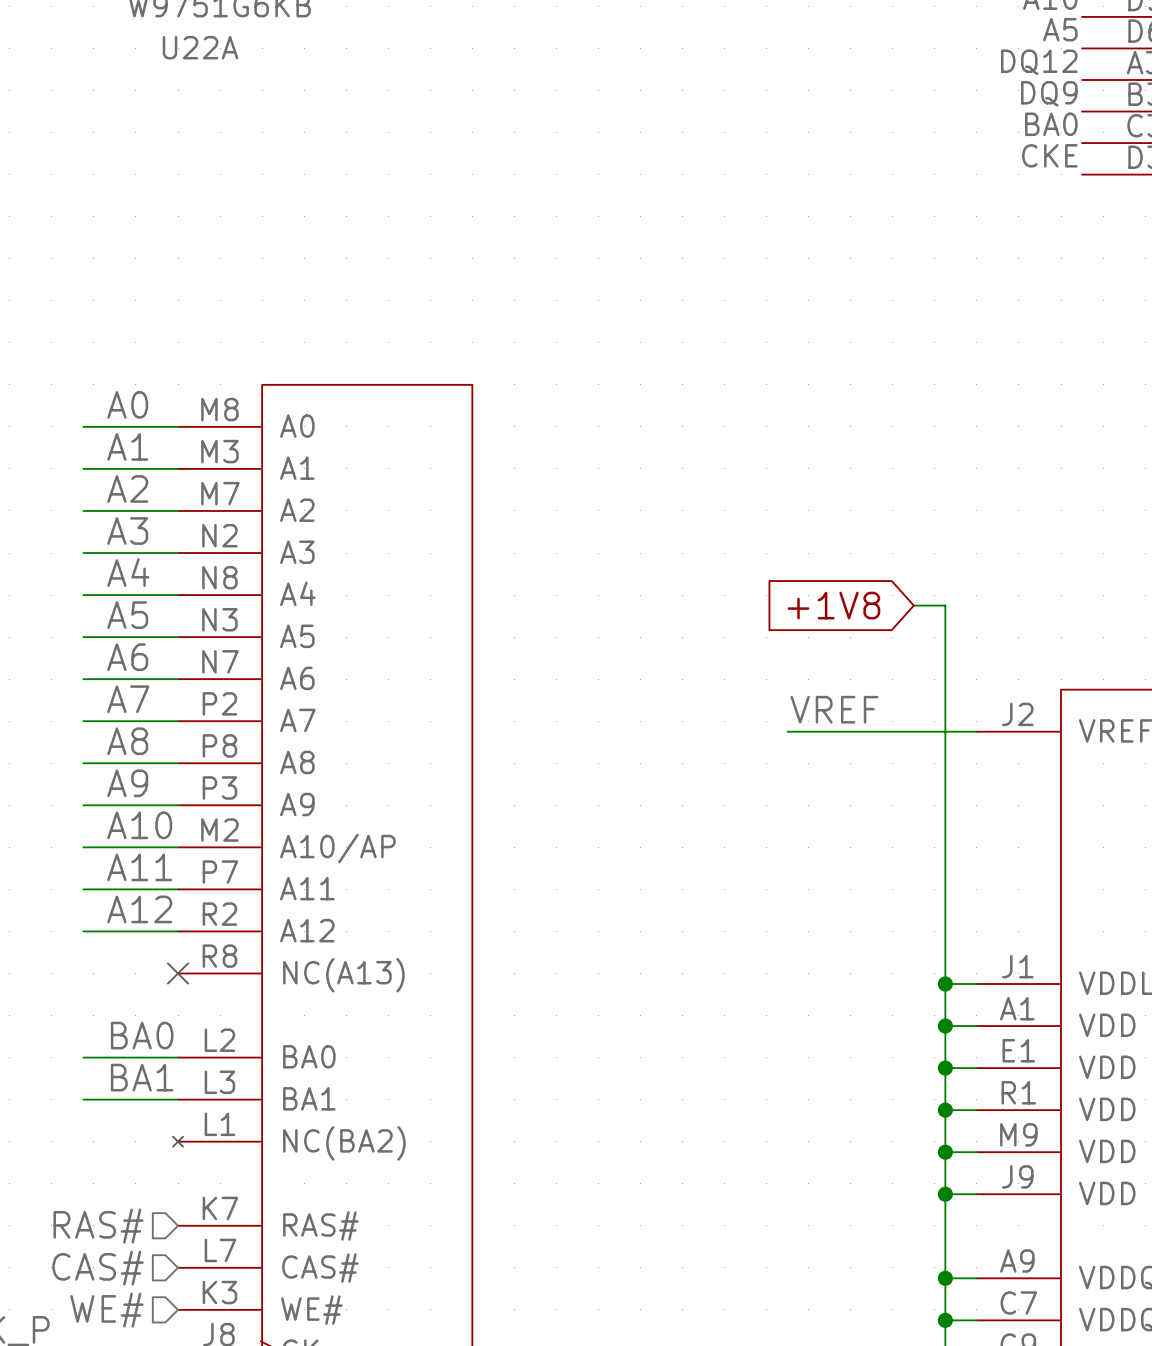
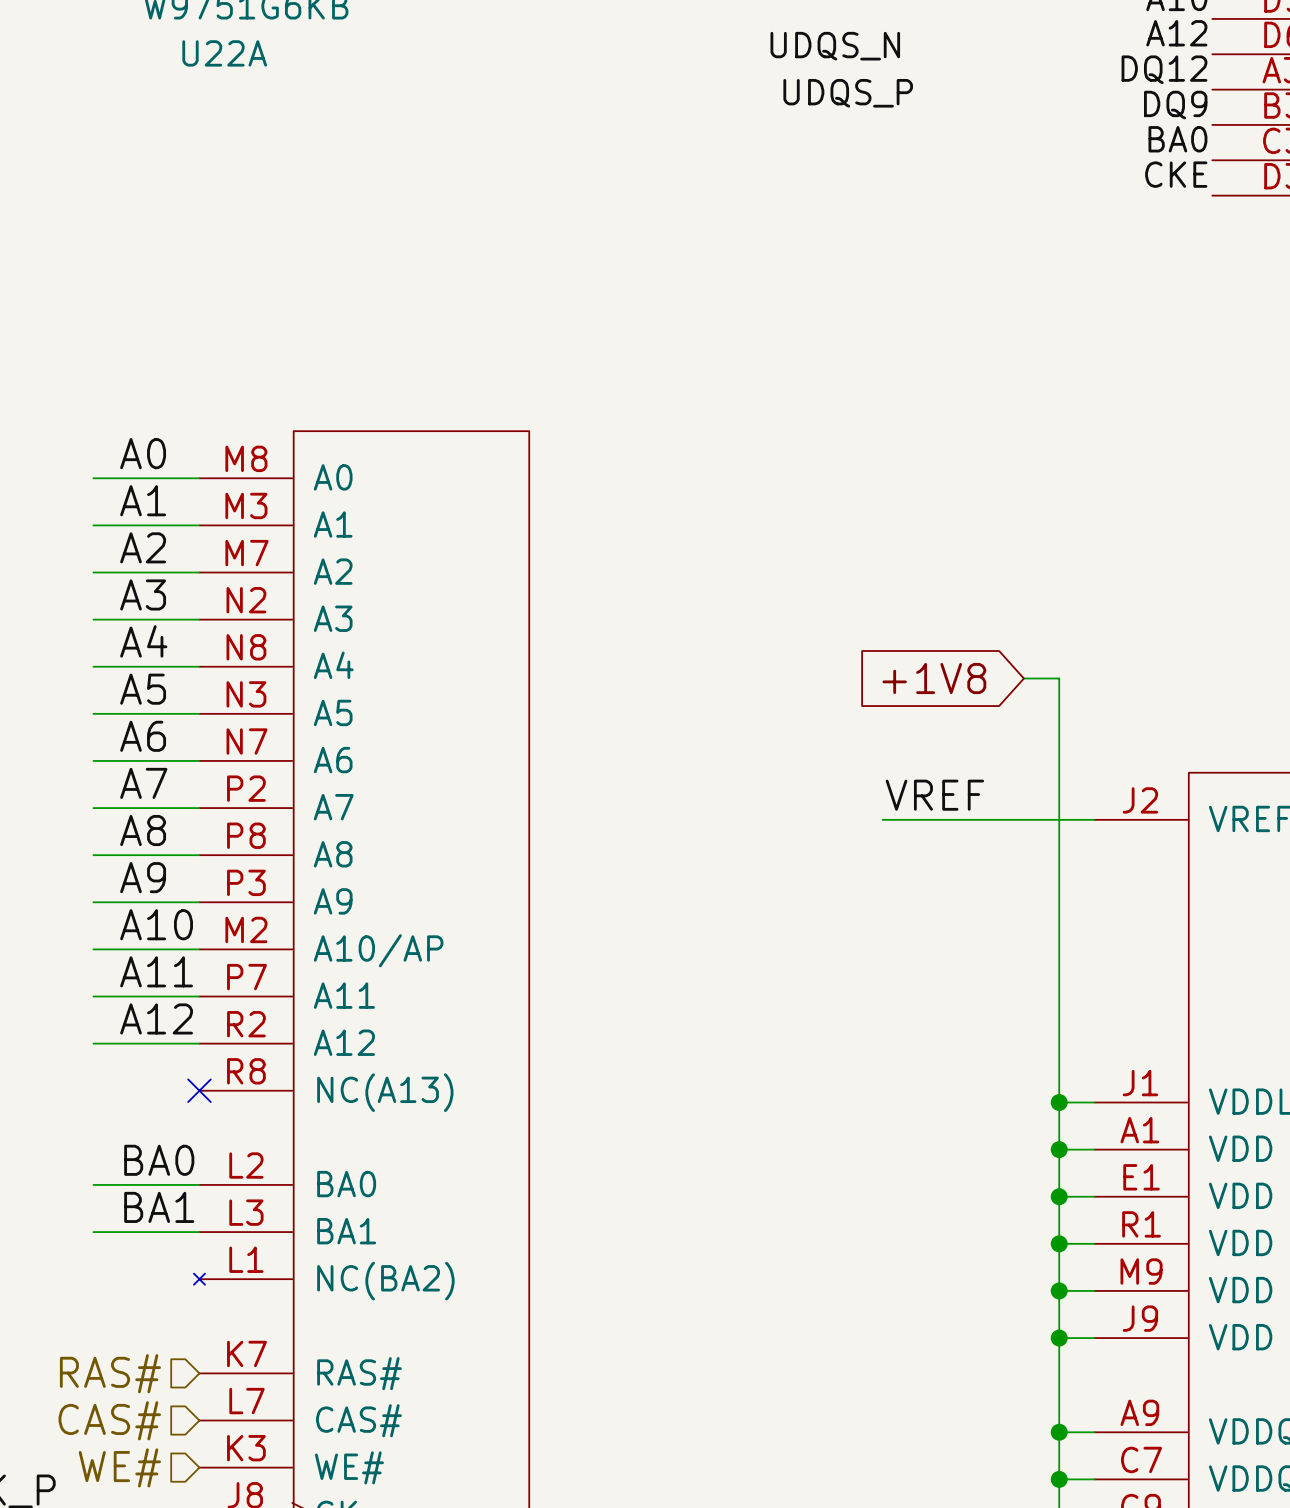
label: A5 (1060, 29) -> A12 (1176, 33)
label: none -> UDQS_N (835, 46)
label: none -> UDQS_P (848, 93)

